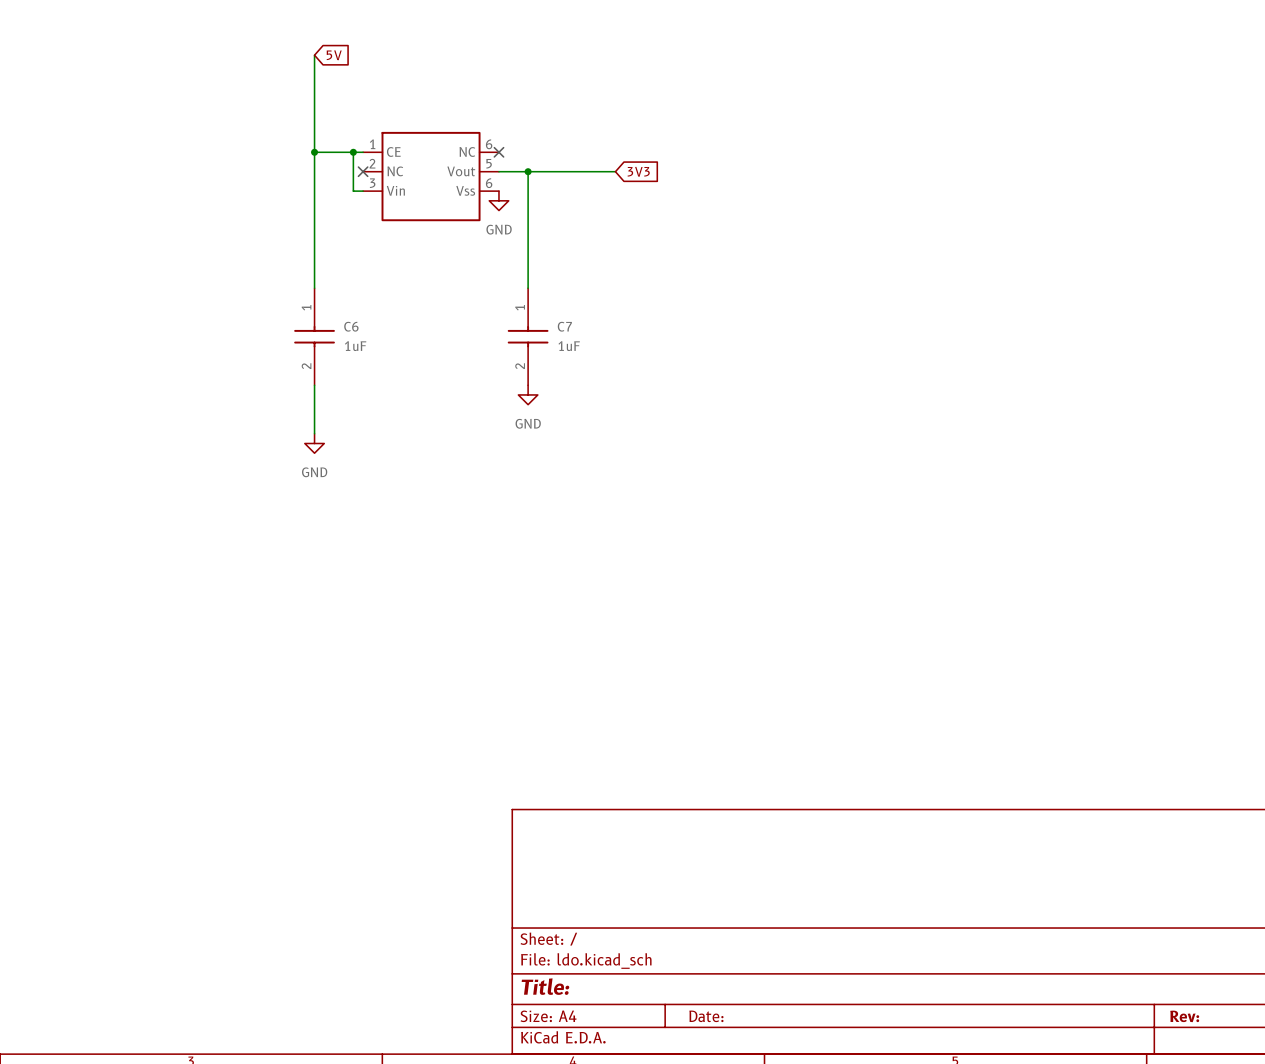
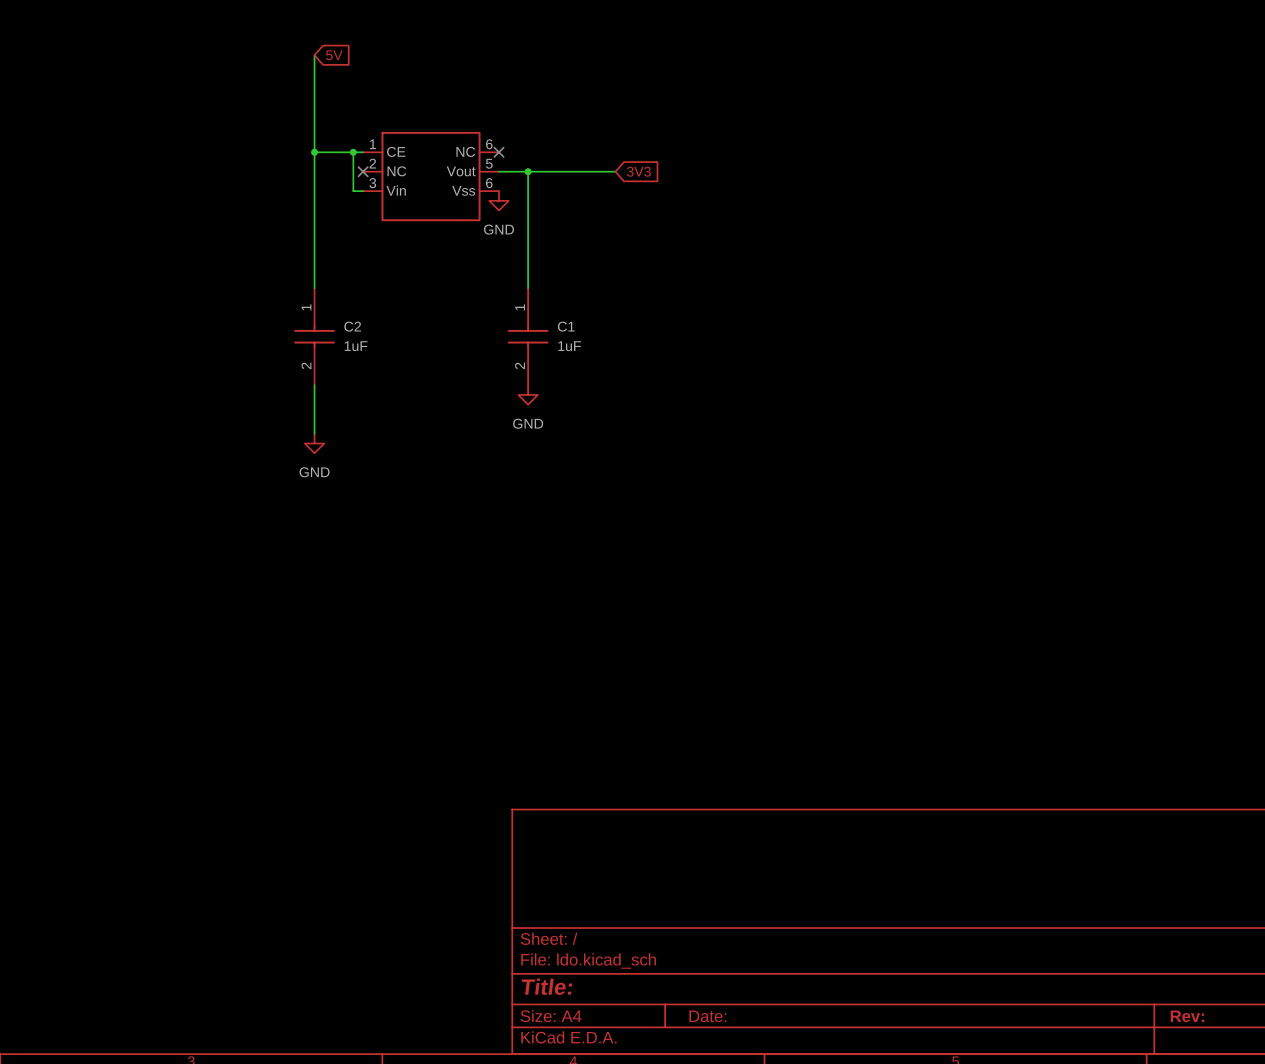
C6 name: C6 (351, 326) -> C2 (352, 326)
C7 name: C7 (564, 326) -> C1 (566, 326)

